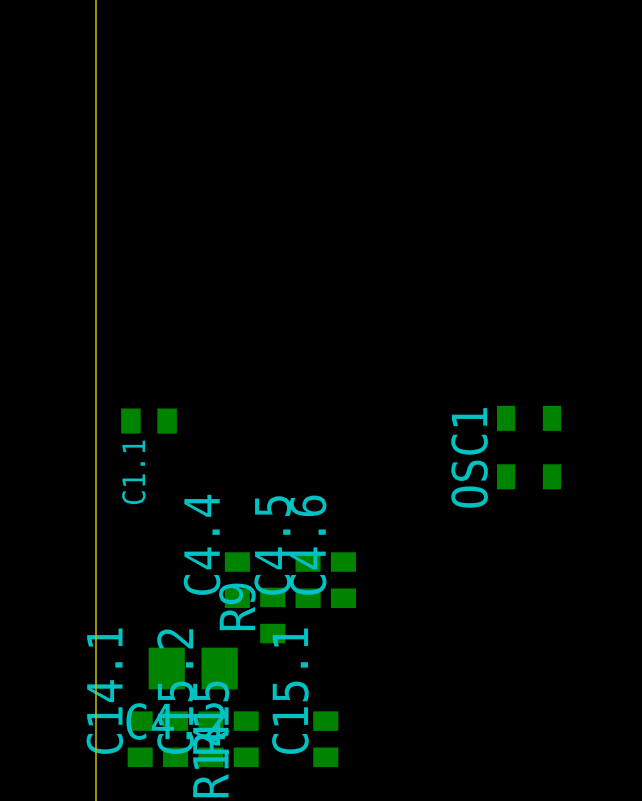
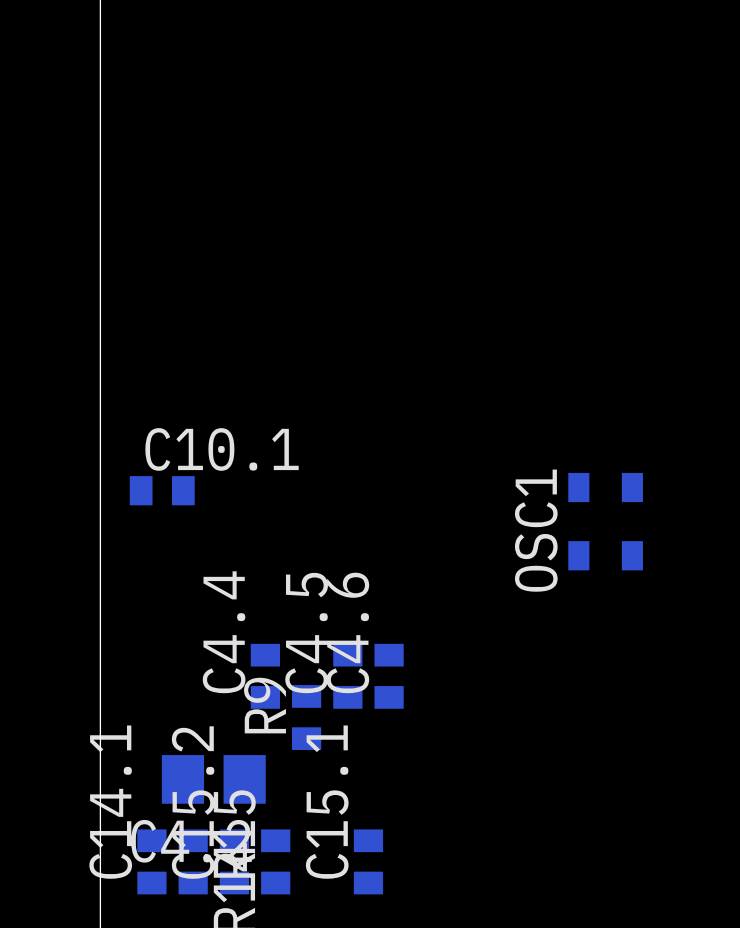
C1.1 name: C1.1 (133, 472) -> C10.1 (222, 449)

